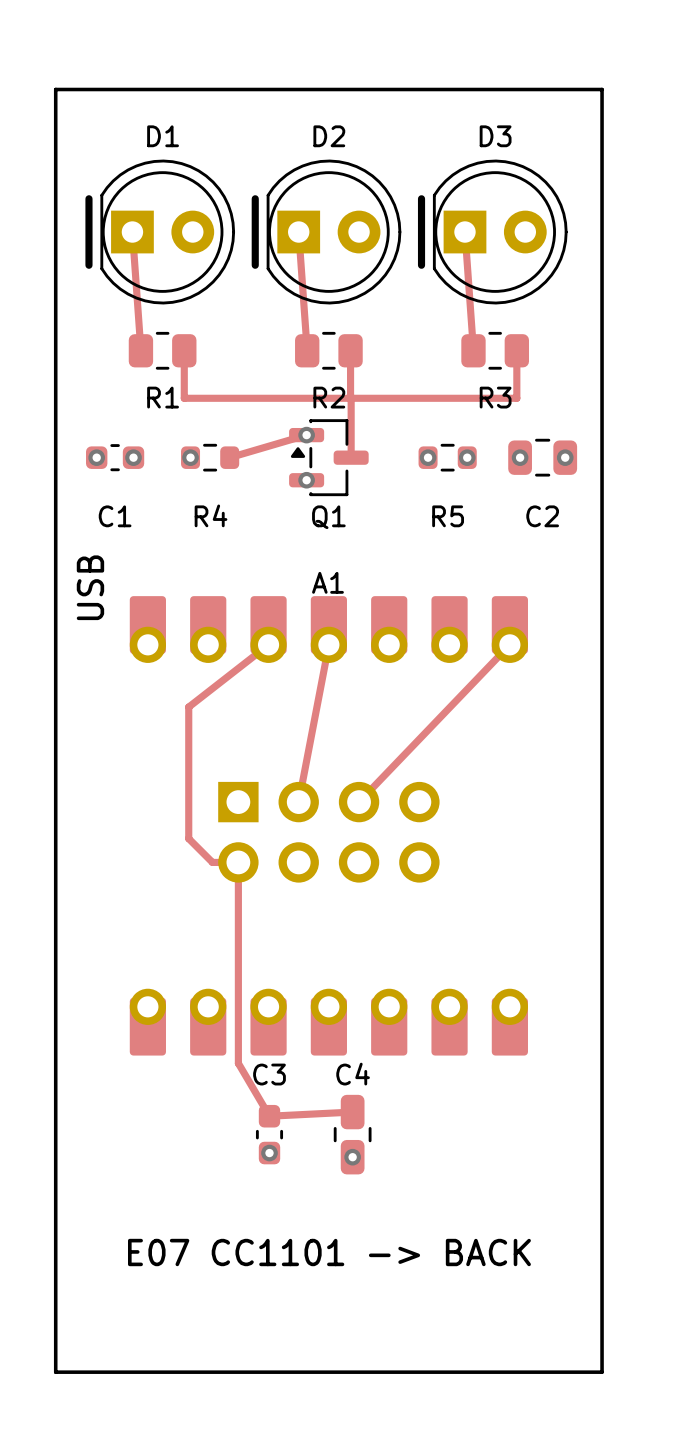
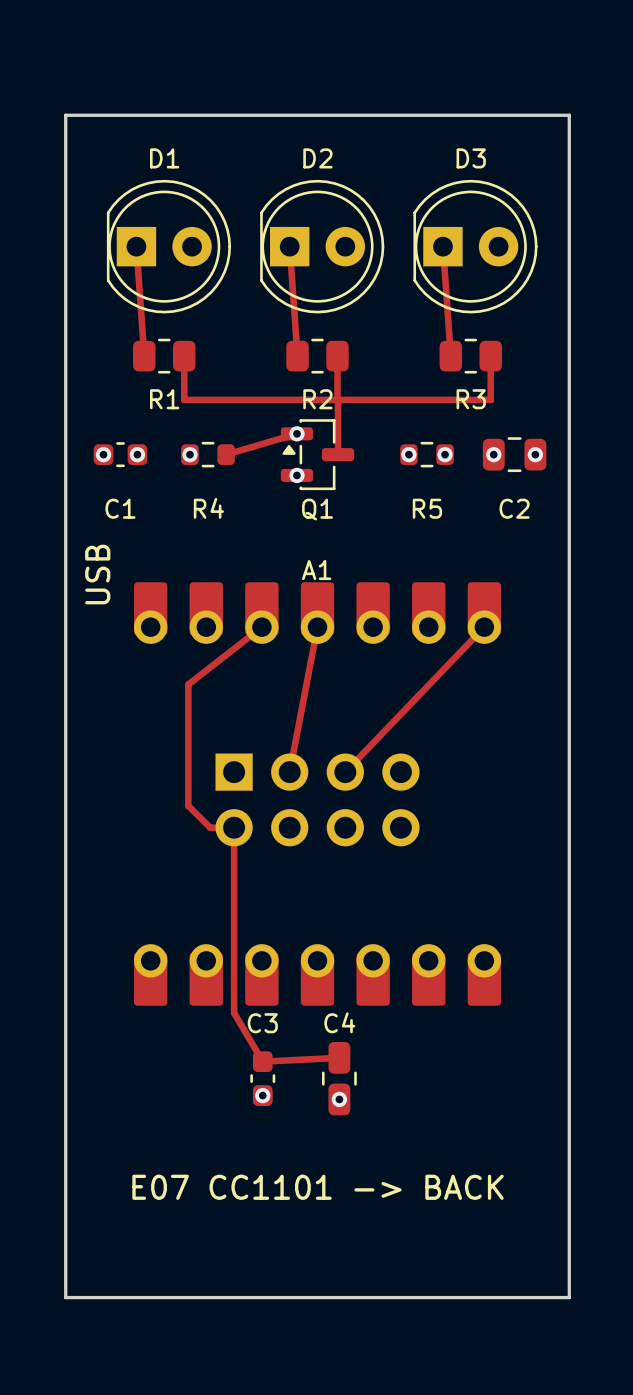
line: (88, 198) (88, 265) -> none
line: (255, 198) (255, 265) -> none
line: (421, 198) (421, 265) -> none

